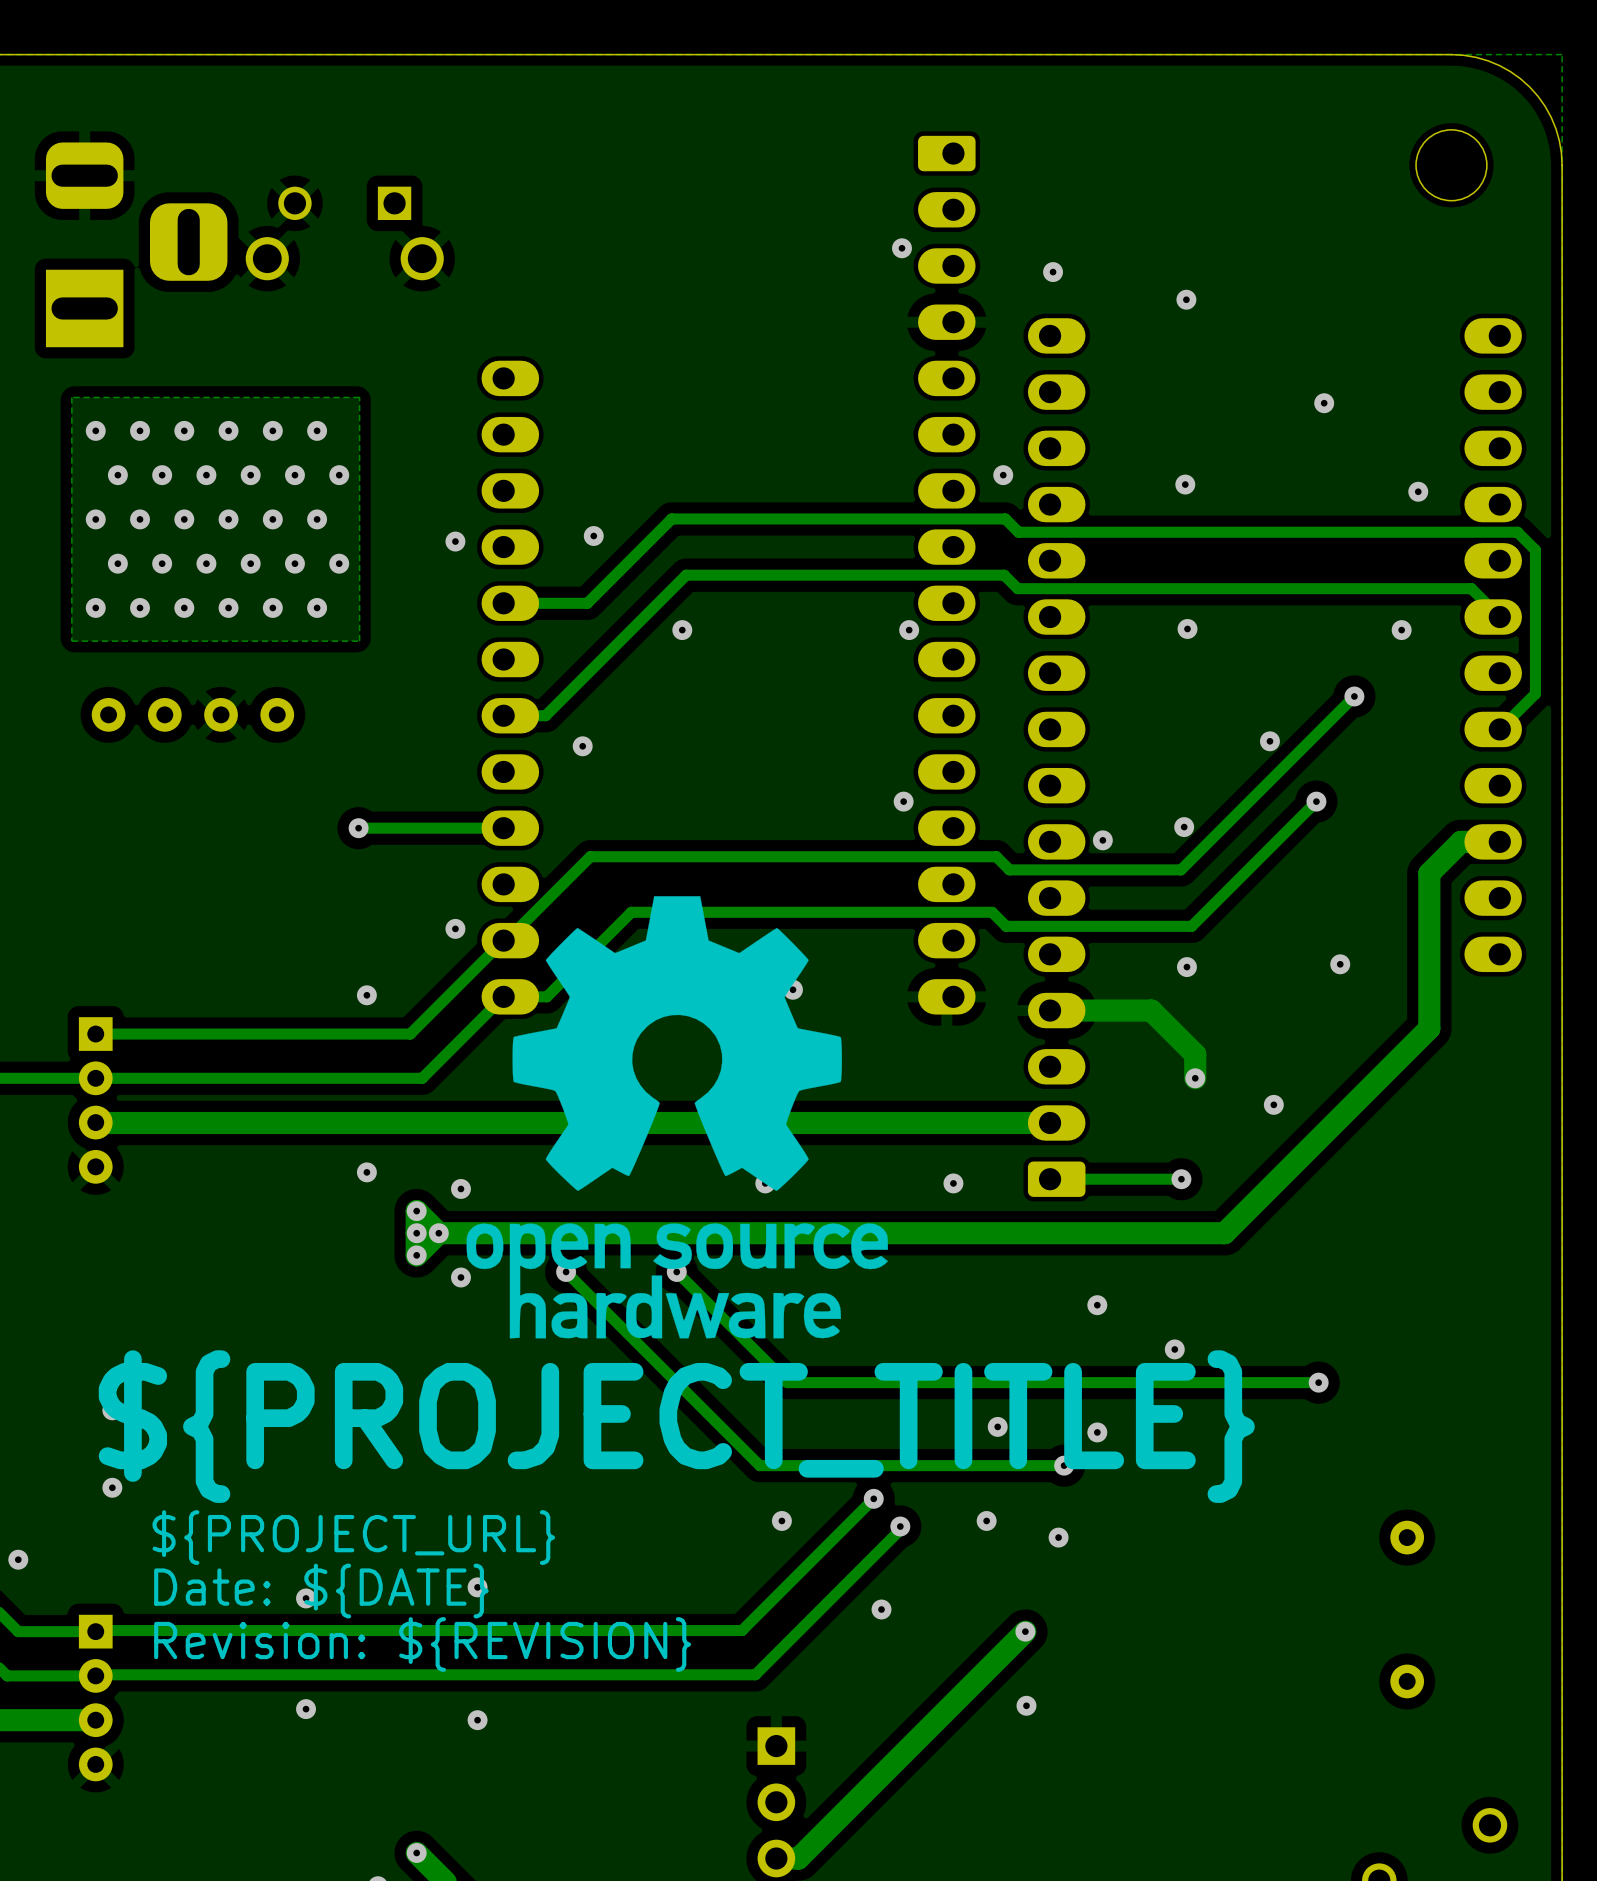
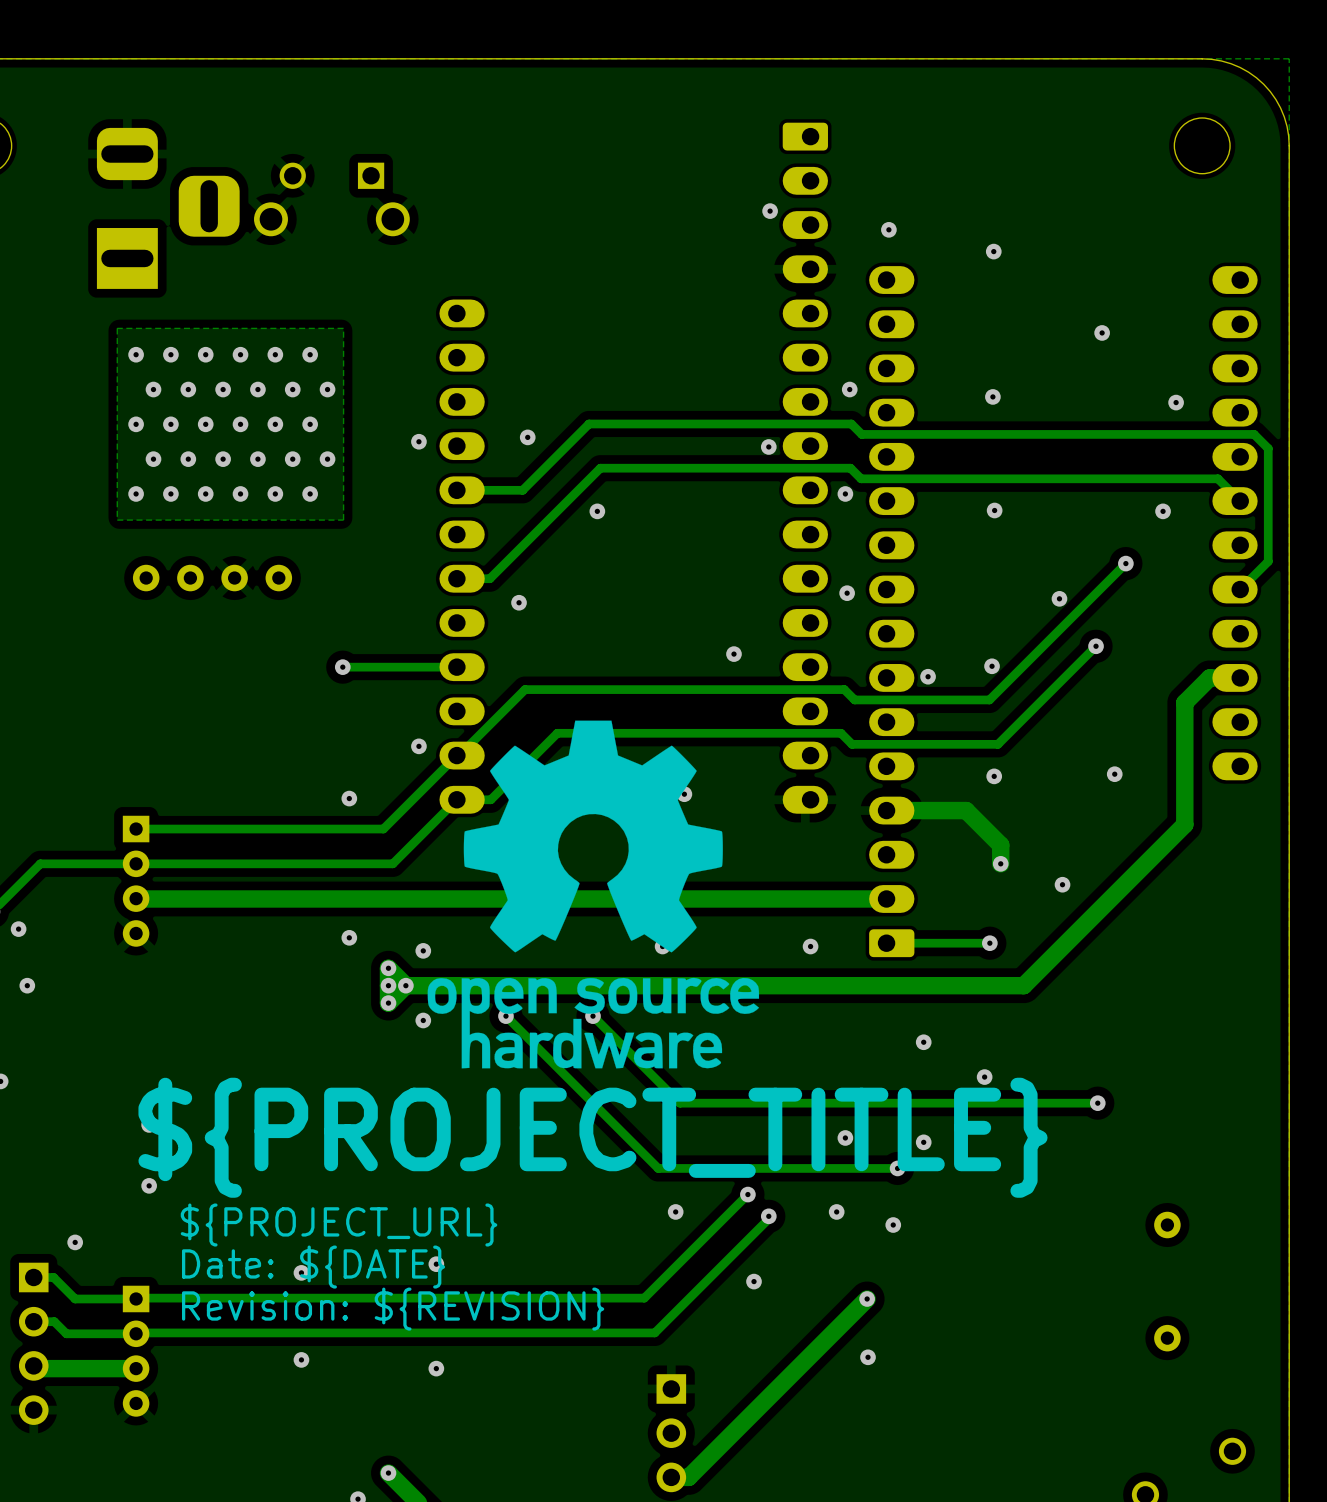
via: none -> (768, 446)
via: none -> (845, 493)
via: (909, 630) -> none
via: none -> (847, 593)
via position: (903, 801) -> (733, 654)

